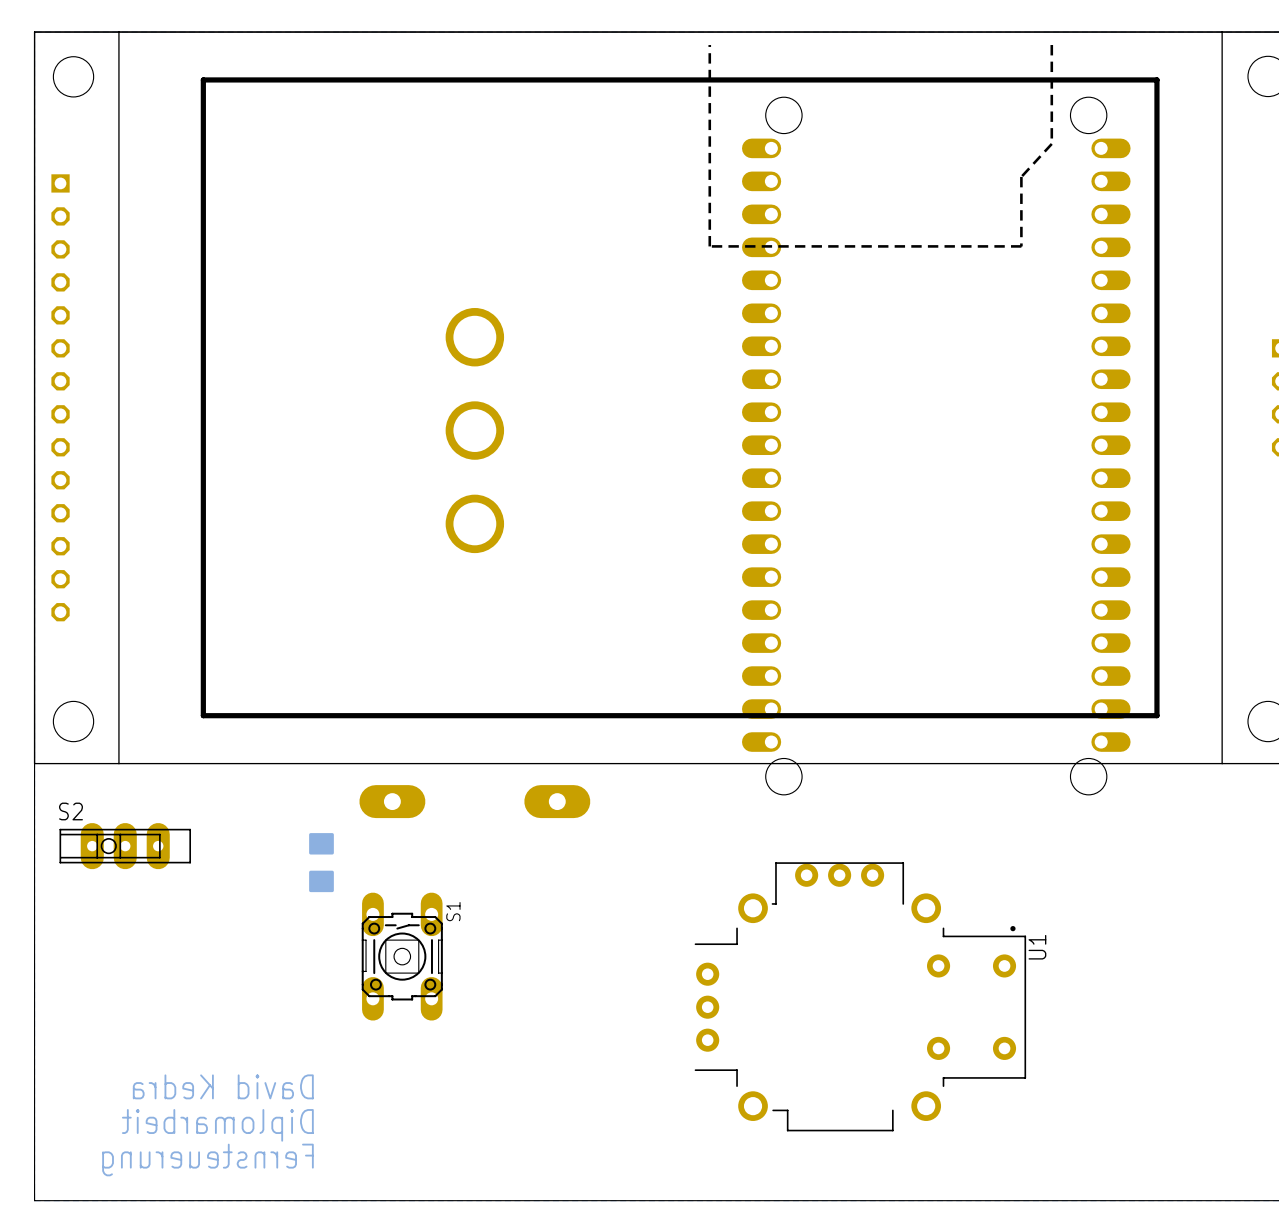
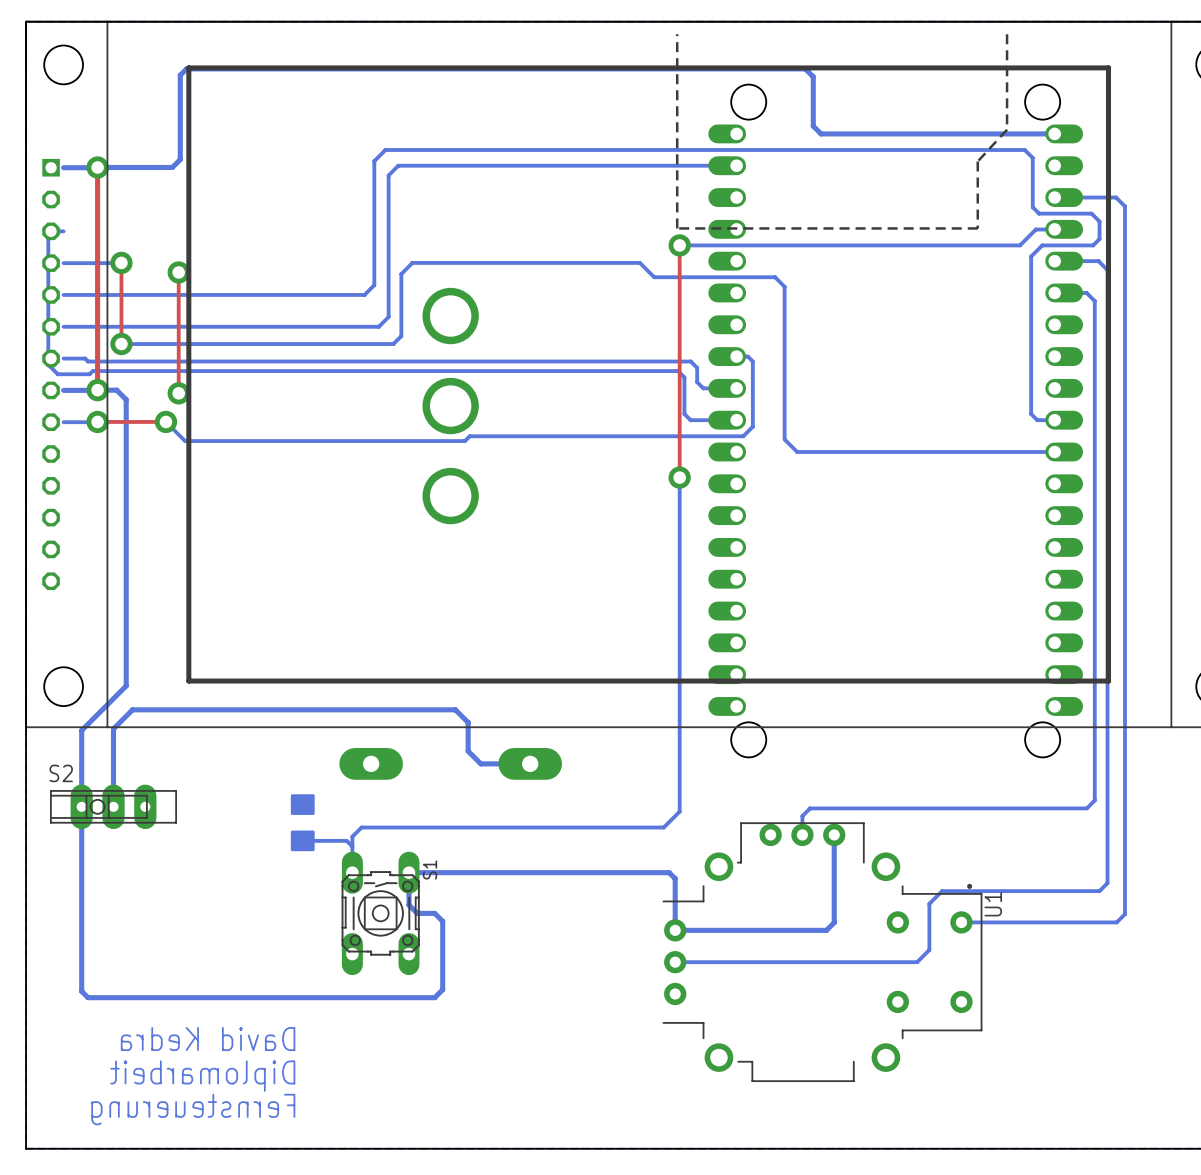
bottom track: none -> (1054, 133) (821, 133) (813, 126) (813, 76) (805, 68) (186, 68) (180, 75) (180, 159) (172, 167) (63, 167)
bottom track: none -> (736, 165) (398, 165) (388, 175) (388, 316) (378, 326) (63, 326)
top track: none -> (97, 167) (97, 390)
via: none -> (97, 167)
bottom track: none -> (1054, 197) (1116, 197) (1124, 206) (1124, 914) (1116, 922) (961, 922)
bottom track: none -> (1054, 229) (1035, 229) (1020, 245) (679, 245)
bottom track: none -> (63, 231) (52, 231) (48, 235) (48, 364) (57, 374) (89, 374) (92, 371) (678, 371) (684, 377) (684, 414) (690, 420) (736, 420)
top track: none -> (679, 245) (679, 477)
via: none -> (679, 245)
bottom track: none -> (1054, 261) (1098, 261) (1107, 270) (1107, 883) (1099, 891) (942, 891) (929, 903) (929, 949) (917, 962) (675, 962)
bottom track: none -> (121, 262) (63, 263)
top track: none -> (121, 262) (121, 344)
via: none -> (121, 262)
top track: none -> (178, 272) (178, 393)
via: none -> (178, 272)
bottom track: none -> (1054, 292) (1086, 292) (1094, 301) (1094, 800) (1086, 808) (810, 808) (802, 816) (802, 834)
bottom track: none -> (63, 294) (364, 294) (374, 285) (374, 161) (385, 150) (1024, 150) (1032, 157) (1032, 207) (1039, 213) (1091, 213) (1099, 221) (1099, 239) (1093, 245) (1042, 245) (1031, 256) (1031, 414) (1037, 420) (1054, 420)
bottom track: none -> (121, 344) (393, 344) (401, 336) (401, 274) (412, 262) (639, 262) (654, 277) (775, 277) (784, 286) (784, 439) (797, 452) (1054, 452)
via: none -> (121, 344)
bottom track: none -> (736, 356) (747, 356) (752, 361) (752, 426) (743, 436) (469, 436) (464, 441) (185, 441) (165, 421)
bottom track: none -> (63, 358) (85, 358) (88, 361) (690, 361) (697, 367) (697, 382) (703, 388) (736, 388)
bottom track: none -> (63, 390) (97, 390)
bottom track: none -> (97, 390) (116, 390) (126, 399) (126, 685) (81, 730) (81, 991) (88, 997) (434, 997) (442, 989) (442, 921) (434, 913) (417, 913) (409, 905) (409, 872) (669, 872) (675, 878) (675, 930) (826, 930) (834, 922) (834, 834)
via: none -> (97, 390)
via: none -> (178, 393)
bottom track: none -> (97, 421) (63, 422)
top track: none -> (97, 421) (165, 421)
via: none -> (97, 421)
via: none -> (165, 421)
bottom track: none -> (679, 477) (679, 811) (663, 827) (361, 827) (352, 836) (352, 872)
via: none -> (679, 477)
bottom track: none -> (530, 763) (480, 763) (468, 751) (468, 722) (455, 709) (132, 709) (113, 728) (113, 806)
bottom track: none -> (302, 840) (346, 840) (352, 846)

